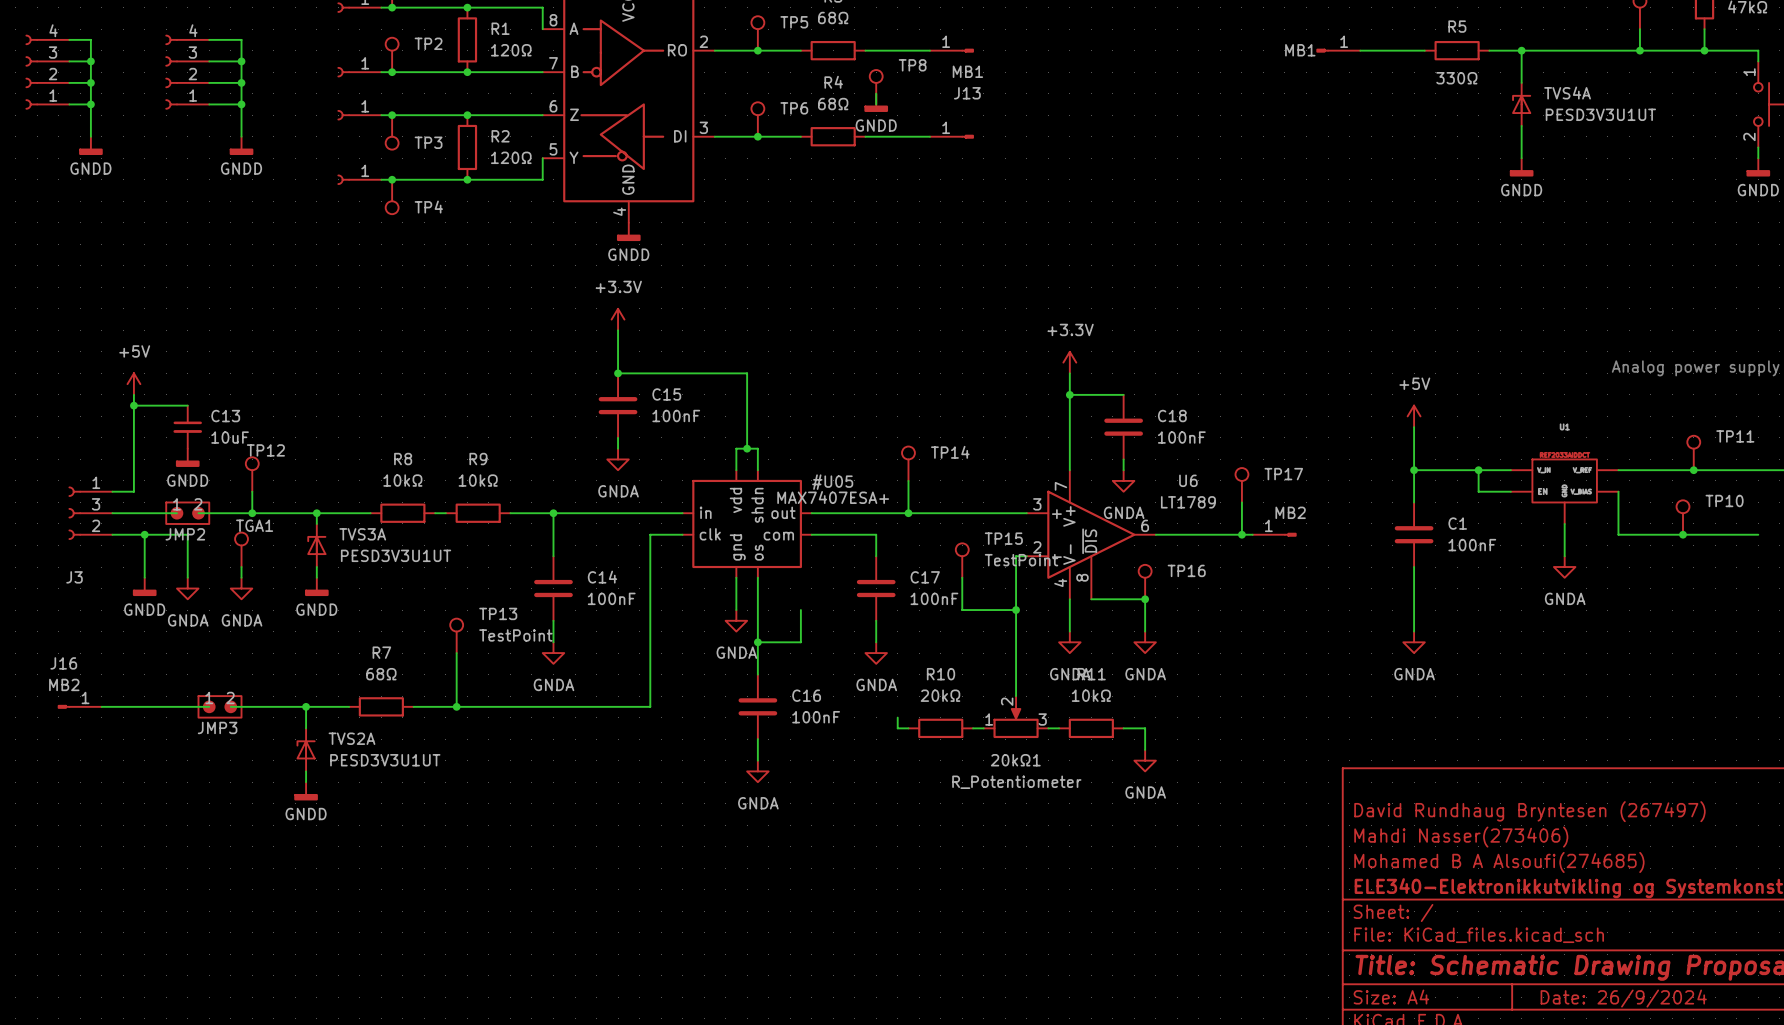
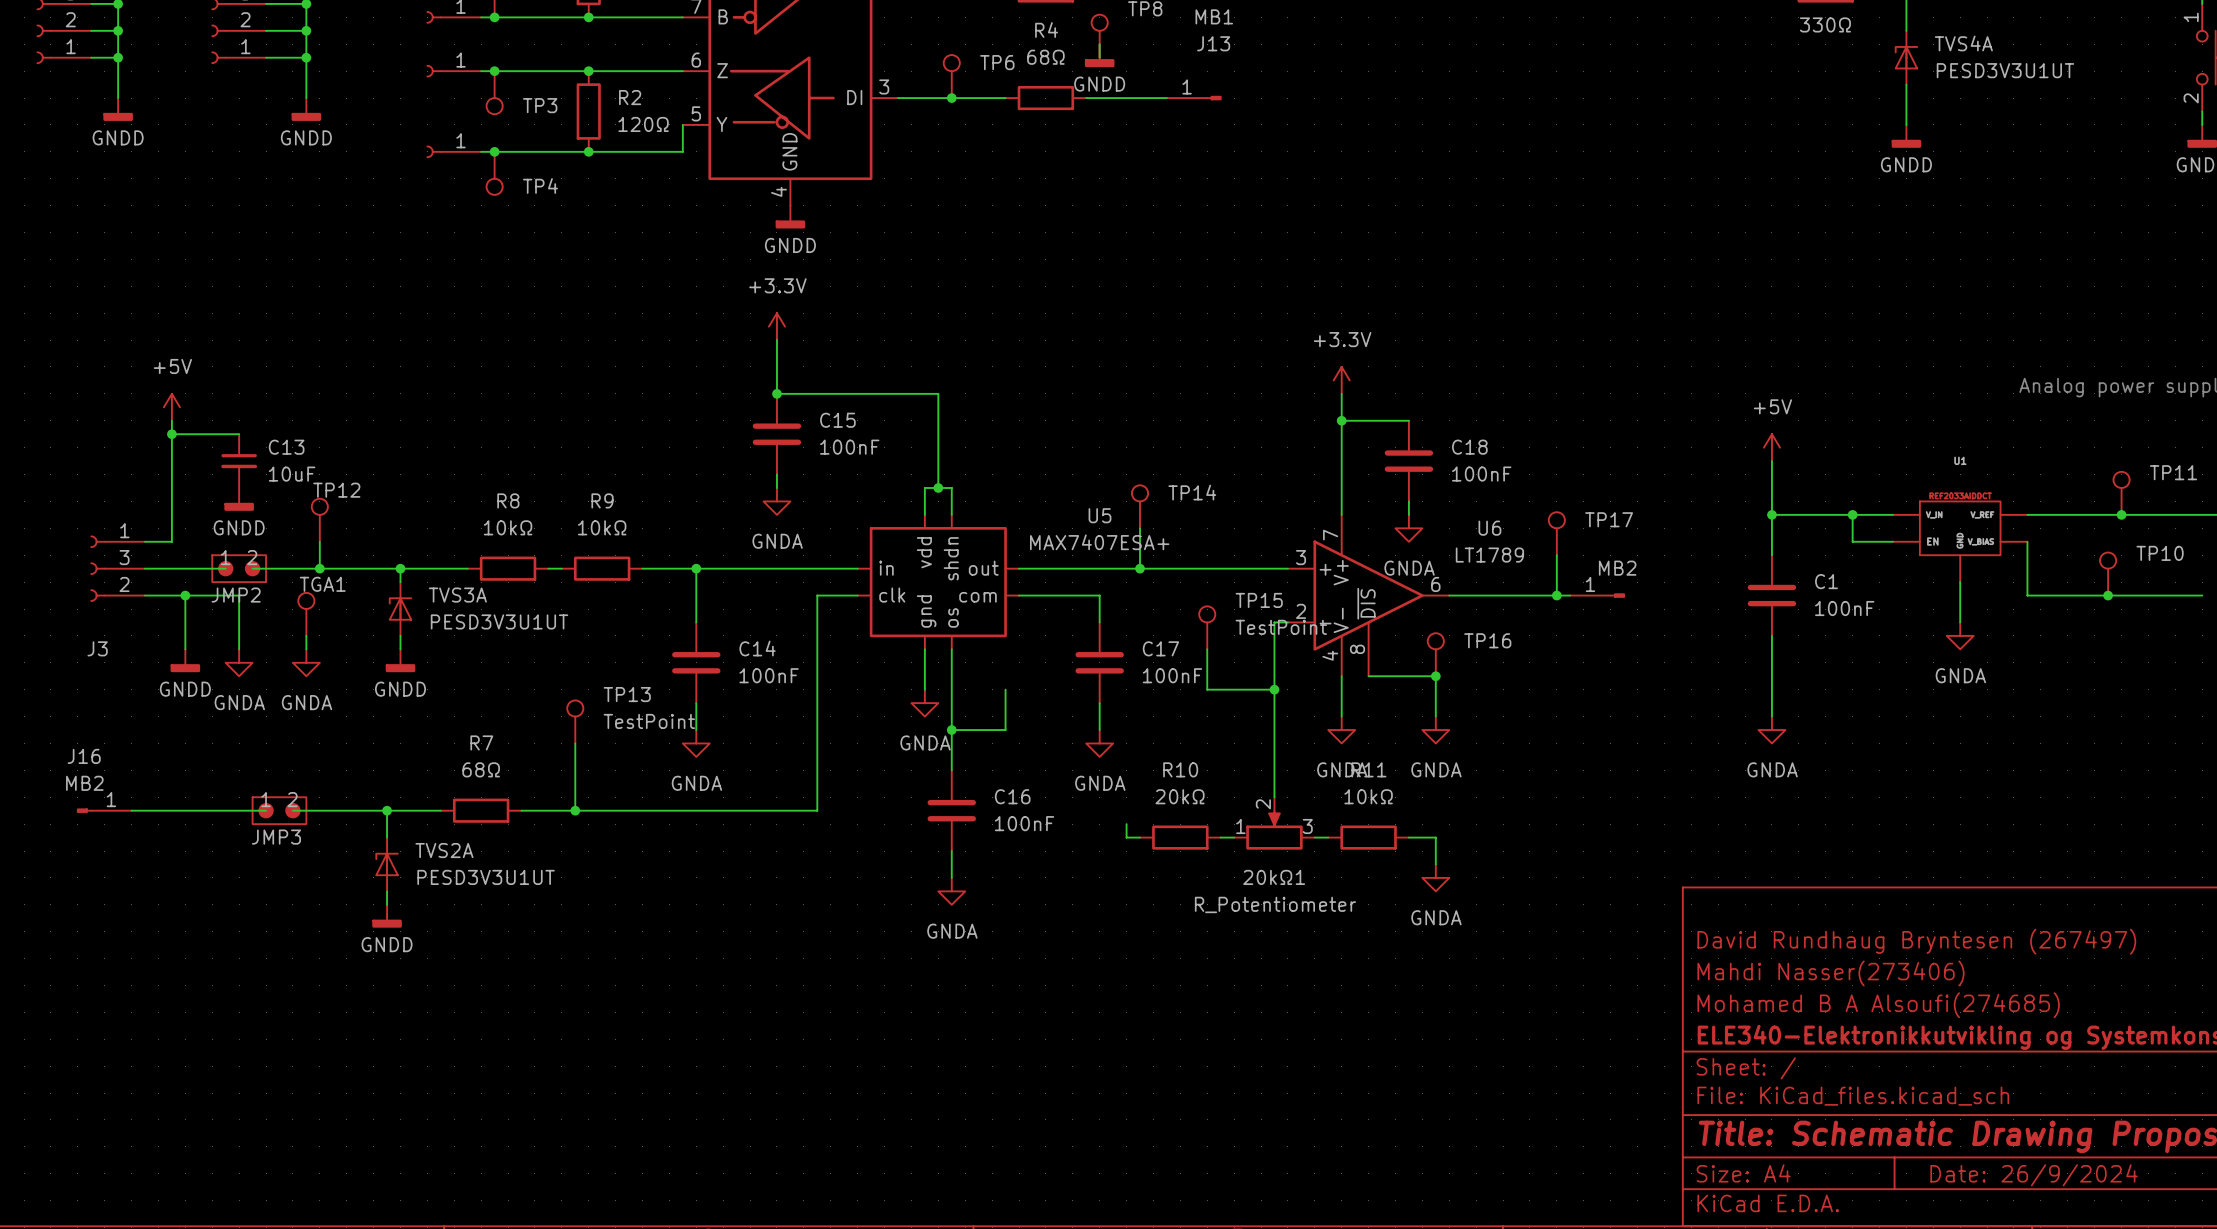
#U05 name: #U05 (832, 482) -> U5 (1099, 515)
#U05 text position: MAX7407ESA+ (833, 497) -> MAX7407ESA+ (1099, 542)

